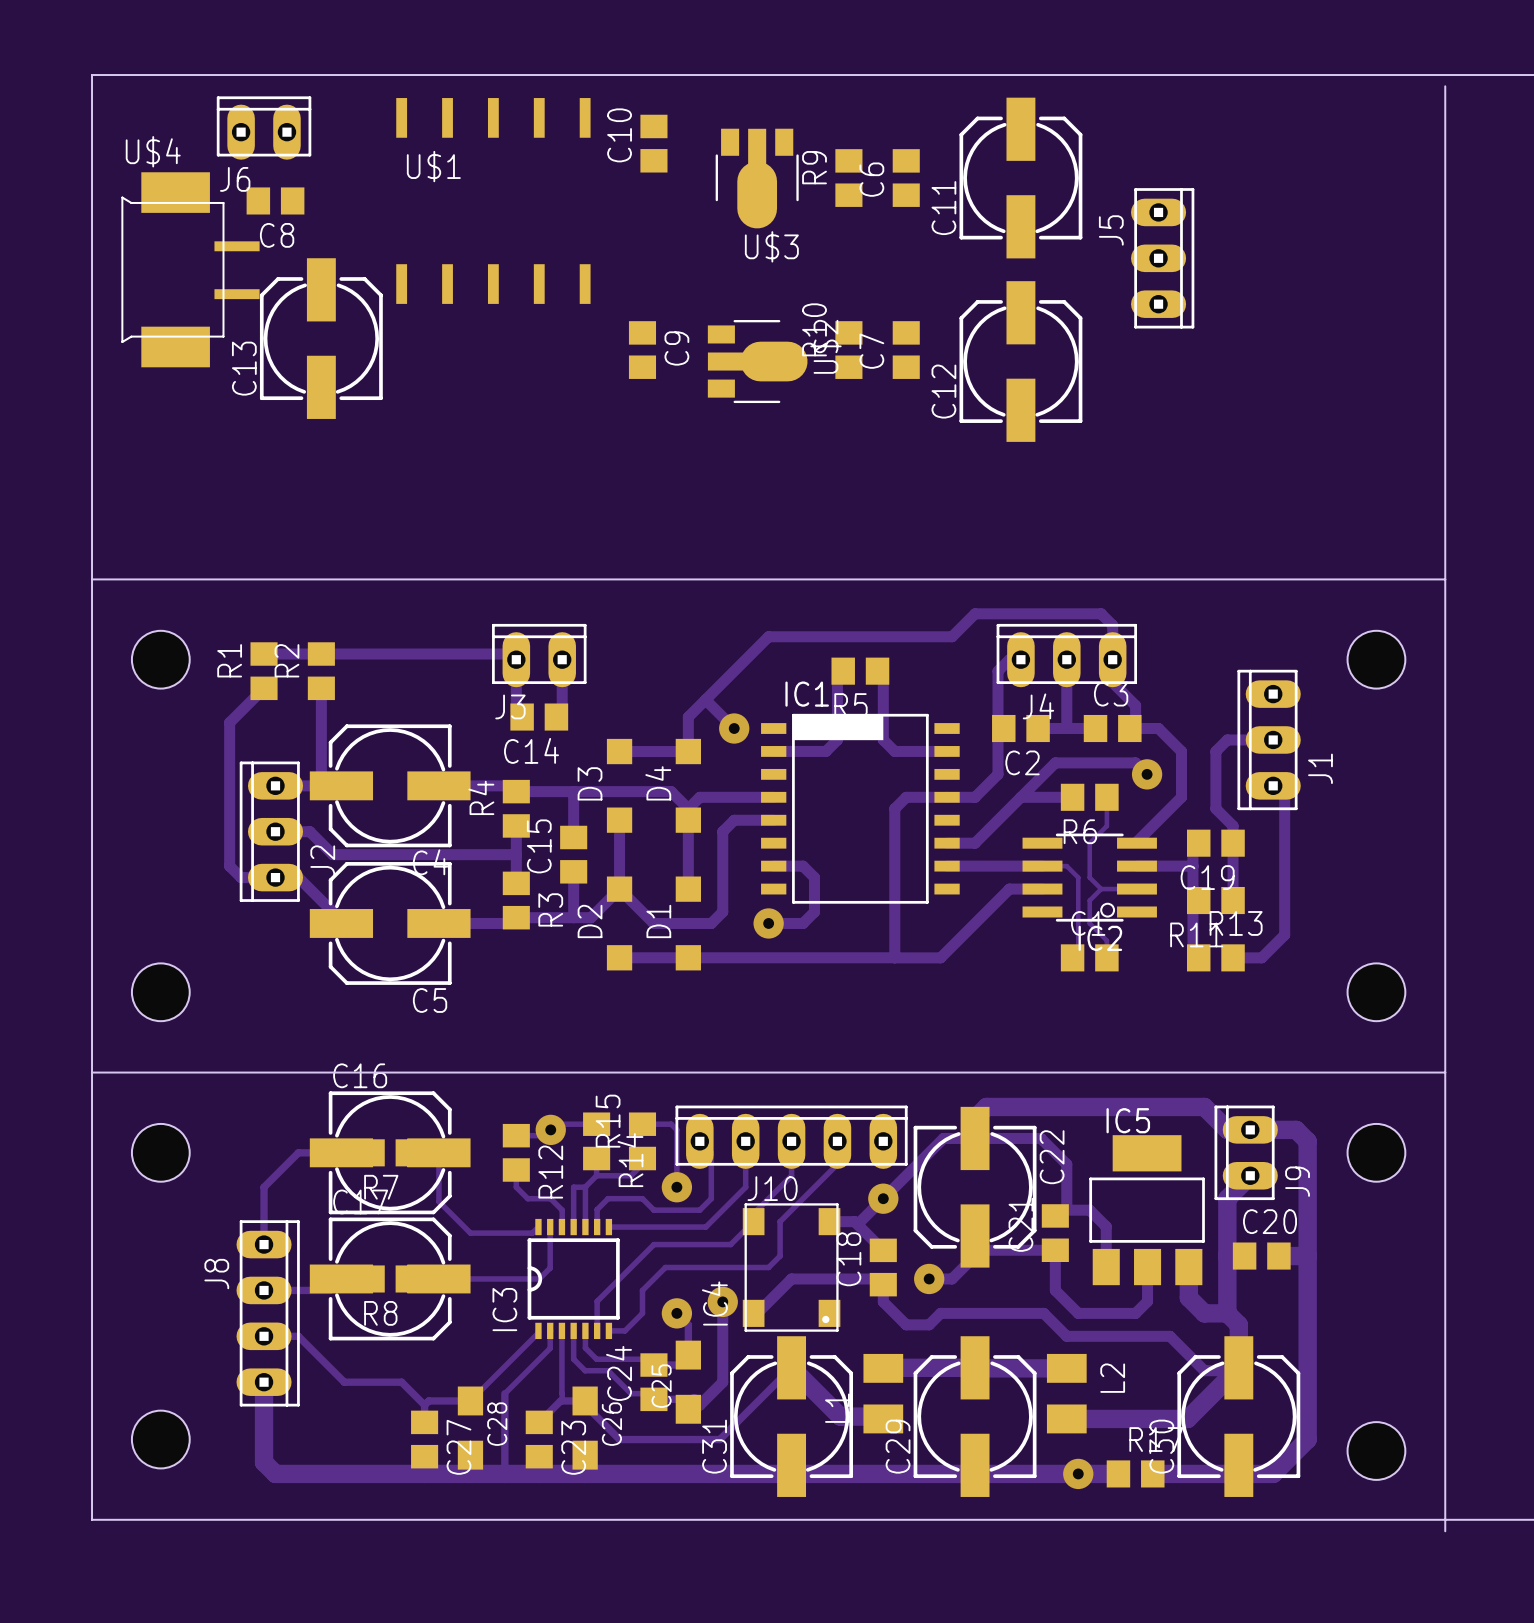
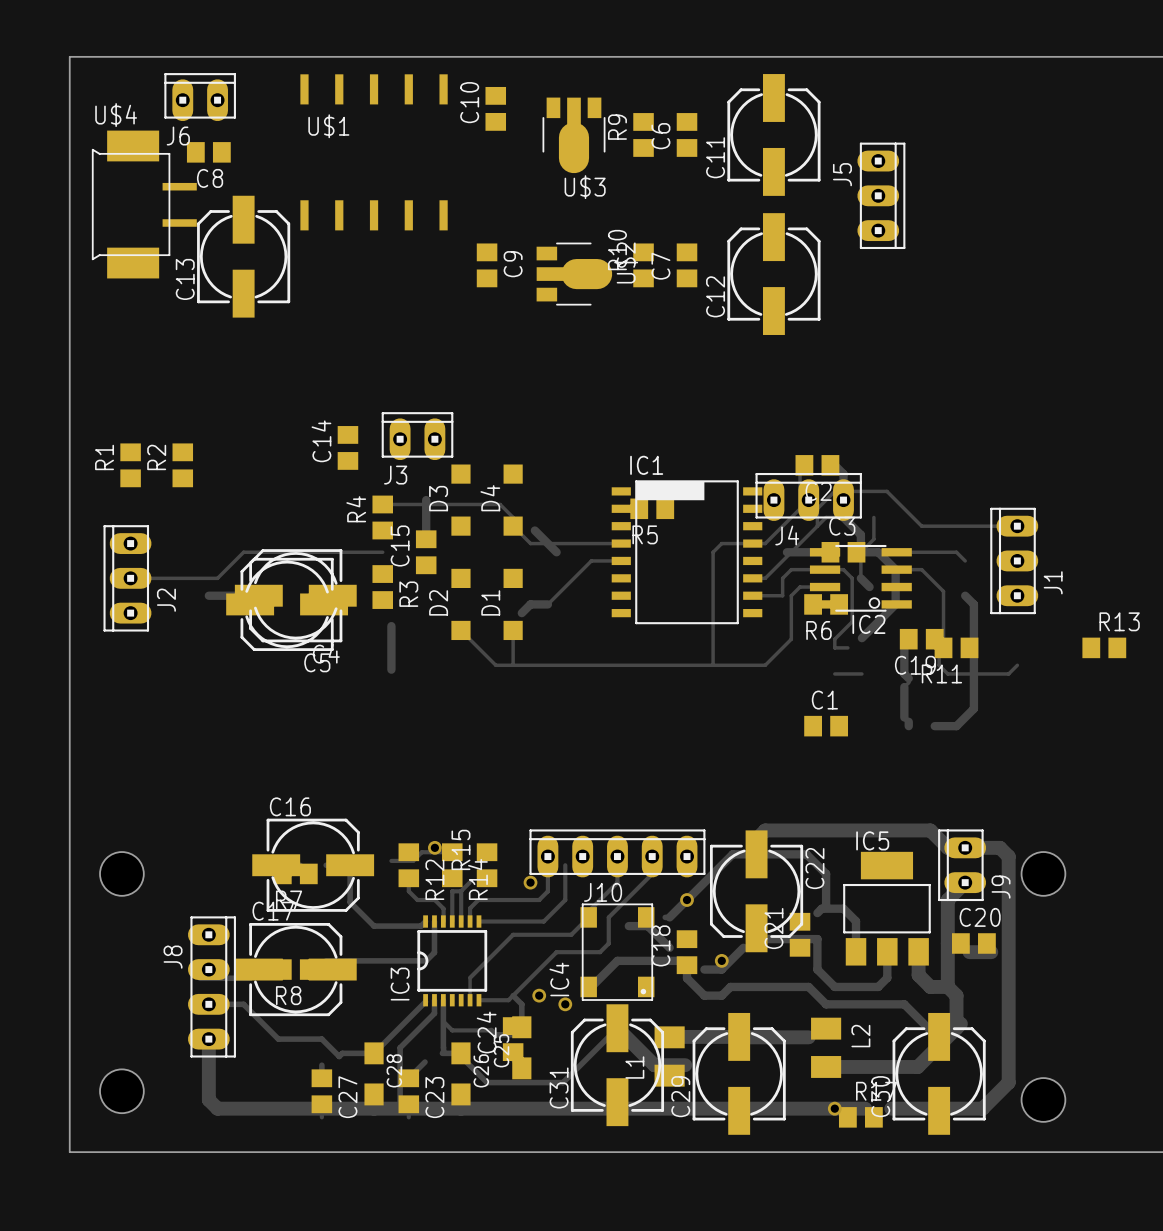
board edge: (1445, 86) (1445, 1531) -> none
board edge: (92, 579) (1445, 579) -> none
track: none -> (804, 465) (800, 469) (800, 508) (765, 543) (721, 543) (713, 552) (713, 665)
track: (1095, 613) (975, 613) (952, 636) (768, 636) (688, 717) (688, 751) (619, 751) -> none
track: (264, 654) (510, 654) (516, 659) (516, 711) (522, 717) -> none
J3 position: (539, 655) -> (417, 436)
hole: (160, 659) -> none
track: (1020, 659) (1009, 659) (998, 671) (998, 722) (1003, 728) -> none
track: (1066, 659) (1066, 728) -> none
hole: (1376, 659) -> none
track: none -> (382, 504) (500, 504) (513, 517) (513, 526) (530, 543) (621, 543)
R1 position: (264, 671) -> (130, 465)
R2 position: (321, 671) -> (182, 465)
track: (843, 671) (837, 676) (837, 739) (825, 751) (773, 751) -> none
track: (877, 671) (883, 676) (883, 739) (894, 751) (947, 751) -> none
track: none -> (847, 517) (826, 517) (765, 578) (752, 578)
track: (264, 688) (229, 722) (229, 866) (241, 877) (298, 877) (332, 911) (332, 914) (341, 923) -> none
track: (321, 688) (321, 785) (341, 785) -> none
track: none -> (817, 526) (817, 508) (834, 491) (886, 491) (921, 526) (1017, 526)
C14 rotation: 0° (539, 717) -> 90° clockwise (347, 447)
C14 position: (539, 717) -> (347, 447)
track: none -> (382, 552) (243, 552) (217, 578) (130, 578)
via: (734, 728) -> none
track: (1003, 728) (998, 734) (998, 774) (975, 797) (906, 797) (894, 808) (894, 957) (940, 957) (1009, 889) (1042, 889) -> none
C2 position: (1020, 728) -> (817, 465)
J1 position: (1269, 739) -> (1014, 560)
track: (1273, 739) (1227, 739) (1215, 751) (1215, 808) (1233, 825) (1233, 900) -> (965, 560) (956, 552) (896, 552)
track: none -> (896, 569) (921, 569) (943, 591) (943, 647) (939, 652) (939, 665) (947, 673) (1008, 673) (1017, 665)
track: (1135, 762) (1055, 762) (975, 843) (947, 843) -> (860, 578) (860, 552) (873, 539) (873, 517)
track: none -> (825, 587) (800, 587) (791, 595) (791, 639) (765, 665) (495, 665) (460, 630)
via: (1147, 774) -> none
track: (438, 785) (516, 785) (516, 791) (671, 791) (688, 808) (688, 889) -> none
D3 position: (619, 785) -> (460, 500)
D4 position: (688, 785) -> (513, 500)
track: none -> (752, 595) (782, 595) (782, 578) (791, 569) (843, 569) (852, 578) (852, 621) (834, 639) (834, 647) (847, 647)
track: (573, 791) (573, 837) -> (513, 630) (513, 665)
track: (722, 797) (773, 797) -> (547, 604) (591, 560) (621, 560)
track: (1020, 797) (1072, 797) -> none
track: (1106, 797) (1106, 826) (1089, 843) (1089, 877) (1101, 889) (1089, 900) (1089, 923) (1106, 940) (1106, 957) -> none
R4 position: (516, 808) -> (382, 517)
IC1 position: (860, 808) -> (687, 552)
track: (619, 820) (619, 889) -> none
track: (773, 820) (734, 820) (722, 831) (722, 911) (711, 923) (653, 923) (619, 889) -> none
J2 position: (271, 831) -> (127, 578)
track: (275, 831) (309, 831) (332, 854) (516, 854) -> none
C15 position: (573, 854) -> (426, 552)
track: (773, 866) (803, 866) (814, 877) (814, 911) (803, 923) (768, 923) -> none
track: (947, 866) (1066, 866) (1078, 877) (1078, 963) -> none
track: (1136, 866) (1192, 866) -> none
track: (573, 871) (573, 917) -> none
IC2 position: (1089, 877) -> (860, 578)
track: (619, 889) (591, 917) (516, 917) (516, 923) (438, 923) -> none
R3 position: (516, 900) -> (382, 587)
R11 position: (1215, 900) -> (956, 647)
C5 position: (390, 923) -> (287, 604)
D2 position: (619, 923) -> (460, 604)
D1 position: (688, 923) -> (513, 604)
via: (768, 923) -> none
track: (619, 957) (894, 957) -> none
R13 position: (1215, 957) -> (1104, 647)
hole: (160, 992) -> none
hole: (1376, 992) -> none
board edge: (92, 1072) (1445, 1072) -> none
via: none -> (434, 847)
track: (642, 1124) (671, 1124) (676, 1129) (676, 1187) -> none
via: (550, 1129) -> none
track: none -> (547, 856) (547, 891) (539, 900) (478, 900) (470, 908) (470, 921)
track: none -> (652, 856) (652, 873) (608, 917) (608, 943) (600, 952) (556, 952) (508, 1000) (478, 1000)
J10 position: (791, 1137) -> (617, 853)
track: (699, 1141) (711, 1152) (711, 1198) (699, 1210) (653, 1210) (642, 1198) (608, 1198) (597, 1209) (597, 1227) -> none
track: (791, 1141) (791, 1175) (757, 1210) (757, 1218) (730, 1244) (653, 1244) (597, 1301) (597, 1330) -> (617, 856) (617, 882) (591, 908) (591, 914) (571, 934) (513, 934) (470, 977) (470, 1000)
track: (837, 1141) (837, 1164) (780, 1221) (780, 1256) (768, 1267) (665, 1267) (642, 1290) (642, 1313) (624, 1330) (608, 1330) -> none
track: (975, 1141) (975, 1118) (986, 1106) (1204, 1106) (1227, 1129) (1296, 1129) (1307, 1141) (1307, 1439) (1273, 1473) (1152, 1473) -> (756, 856) (756, 839) (765, 830) (930, 830) (947, 847) (999, 847) (1008, 856) (1008, 1082) (982, 1108) (891, 1108)
C16 position: (390, 1152) -> (313, 865)
track: (407, 1152) (438, 1152) (438, 1201) (470, 1233) (532, 1233) (538, 1227) -> (326, 865) (350, 865) (350, 902) (374, 926) (420, 926) (425, 921)
R12 position: (516, 1152) -> (408, 865)
J9 position: (1246, 1152) -> (962, 865)
track: (355, 1155) (352, 1152) (298, 1152) (264, 1187) (264, 1244) -> none
track: (596, 1158) (596, 1175) (585, 1187) (573, 1187) (573, 1227) -> none
track: (642, 1158) (642, 1164) (631, 1175) (608, 1175) -> (469, 882) (460, 891)
via: none -> (530, 882)
track: (516, 1169) (516, 1187) (527, 1198) (550, 1198) (562, 1210) (561, 1227) -> (408, 878) (408, 891) (417, 900) (434, 900) (443, 908) (443, 921)
track: none -> (452, 891) (452, 921)
track: (1250, 1175) (1227, 1198) (1227, 1313) -> (965, 882) (947, 900) (947, 986)
track: (585, 1186) (585, 1227) -> (461, 891) (461, 921)
via: (676, 1187) -> none
via: none -> (687, 900)
C22 position: (975, 1187) -> (756, 891)
via: (883, 1198) -> none
IC5 position: (1147, 1210) -> (886, 908)
track: none -> (434, 921) (434, 952) (426, 960) (326, 960)
track: (717, 1215) (705, 1227) (608, 1227) -> (543, 921) (478, 921)
track: (854, 1221) (860, 1221) (943, 1138) (1040, 1138) (1066, 1164) (1066, 1204) (1055, 1215) (1061, 1210) (1089, 1210) (1106, 1226) (1106, 1267) -> (665, 917) (669, 917) (732, 854) (806, 854) (826, 873) (826, 904) (817, 913) (821, 908) (843, 908) (856, 921) (856, 951)
track: none -> (756, 926) (756, 934) (760, 939) (817, 939) (817, 969) (834, 986) (878, 986) (887, 977) (887, 951) (887, 969)
track: (550, 1227) (550, 1268) (539, 1278) (407, 1278) -> none
track: (975, 1233) (975, 1244) (980, 1250) (1055, 1250) (1055, 1290) (1066, 1301) -> (721, 995) (730, 986) (808, 986)
C20 position: (1261, 1256) -> (973, 943)
IC4 position: (791, 1267) -> (617, 952)
C18 position: (883, 1267) -> (687, 952)
via: none -> (721, 960)
track: (1188, 1267) (1188, 1297) (1204, 1313) (1227, 1313) -> (918, 951) (918, 975) (930, 986) (947, 986)
IC3 position: (573, 1278) -> (452, 960)
via: (929, 1278) -> none
track: (1147, 1289) (1147, 1267) (1147, 1301) (1135, 1313) (1078, 1313) -> (947, 986) (956, 995) (956, 1028) (954, 1030) (930, 1030) (904, 1004) (826, 1004) (817, 995)
track: (722, 1301) (722, 1382) (699, 1405) -> none
via: (722, 1301) -> none
J8 position: (268, 1313) -> (211, 986)
via: (676, 1313) -> none
via: none -> (539, 995)
track: (753, 1313) (757, 1313) (791, 1278) (877, 1278) (883, 1284) (883, 1301) (906, 1324) (929, 1324) (940, 1313) -> (588, 986) (591, 986) (617, 960) (682, 960) (687, 965) (687, 978) (704, 995) (713, 995)
track: (952, 1313) (1043, 1313) (1066, 1336) (1170, 1336) (1204, 1370) (1235, 1370) (1238, 1367) (1238, 1324) (1227, 1313) -> none
track: none -> (425, 1000) (374, 1053) (342, 1053) (339, 1056) (321, 1039) (278, 1039) (243, 1004) (208, 1004)
via: none -> (565, 1004)
track: (538, 1330) (470, 1400) (428, 1400) (424, 1405) (401, 1382) (344, 1382) (298, 1336) (264, 1336) -> none
track: (550, 1330) (550, 1348) (504, 1393) (504, 1473) -> (434, 1000) (434, 1013) (400, 1047) (400, 1108)
track: (561, 1330) (562, 1399) (560, 1400) (585, 1400) (585, 1405) (619, 1439) (719, 1439) (791, 1367) -> (443, 1000) (442, 1053) (460, 1053) (460, 1056) (487, 1082) (563, 1082) (617, 1028)
track: (573, 1330) (573, 1359) (585, 1370) (608, 1370) (631, 1393) (648, 1393) (653, 1399) (694, 1399) (699, 1405) -> none
track: (1244, 1362) (1187, 1418) (1066, 1418) -> (960, 1023) (917, 1066) (826, 1066)
track: (791, 1367) (840, 1416) (880, 1416) (883, 1418) -> (617, 1028) (654, 1065) (685, 1065) (687, 1066)
track: none -> (208, 1039) (208, 1099) (217, 1108) (865, 1108)
track: (264, 1382) (264, 1462) (275, 1473) (1118, 1473) -> none
C24 position: (653, 1382) -> (513, 1039)
L2 position: (1066, 1393) -> (826, 1047)
C31 position: (791, 1416) -> (617, 1065)
C28 position: (470, 1428) -> (374, 1073)
C26 position: (585, 1428) -> (460, 1073)
via: none -> (834, 1108)
via: (1078, 1473) -> none

